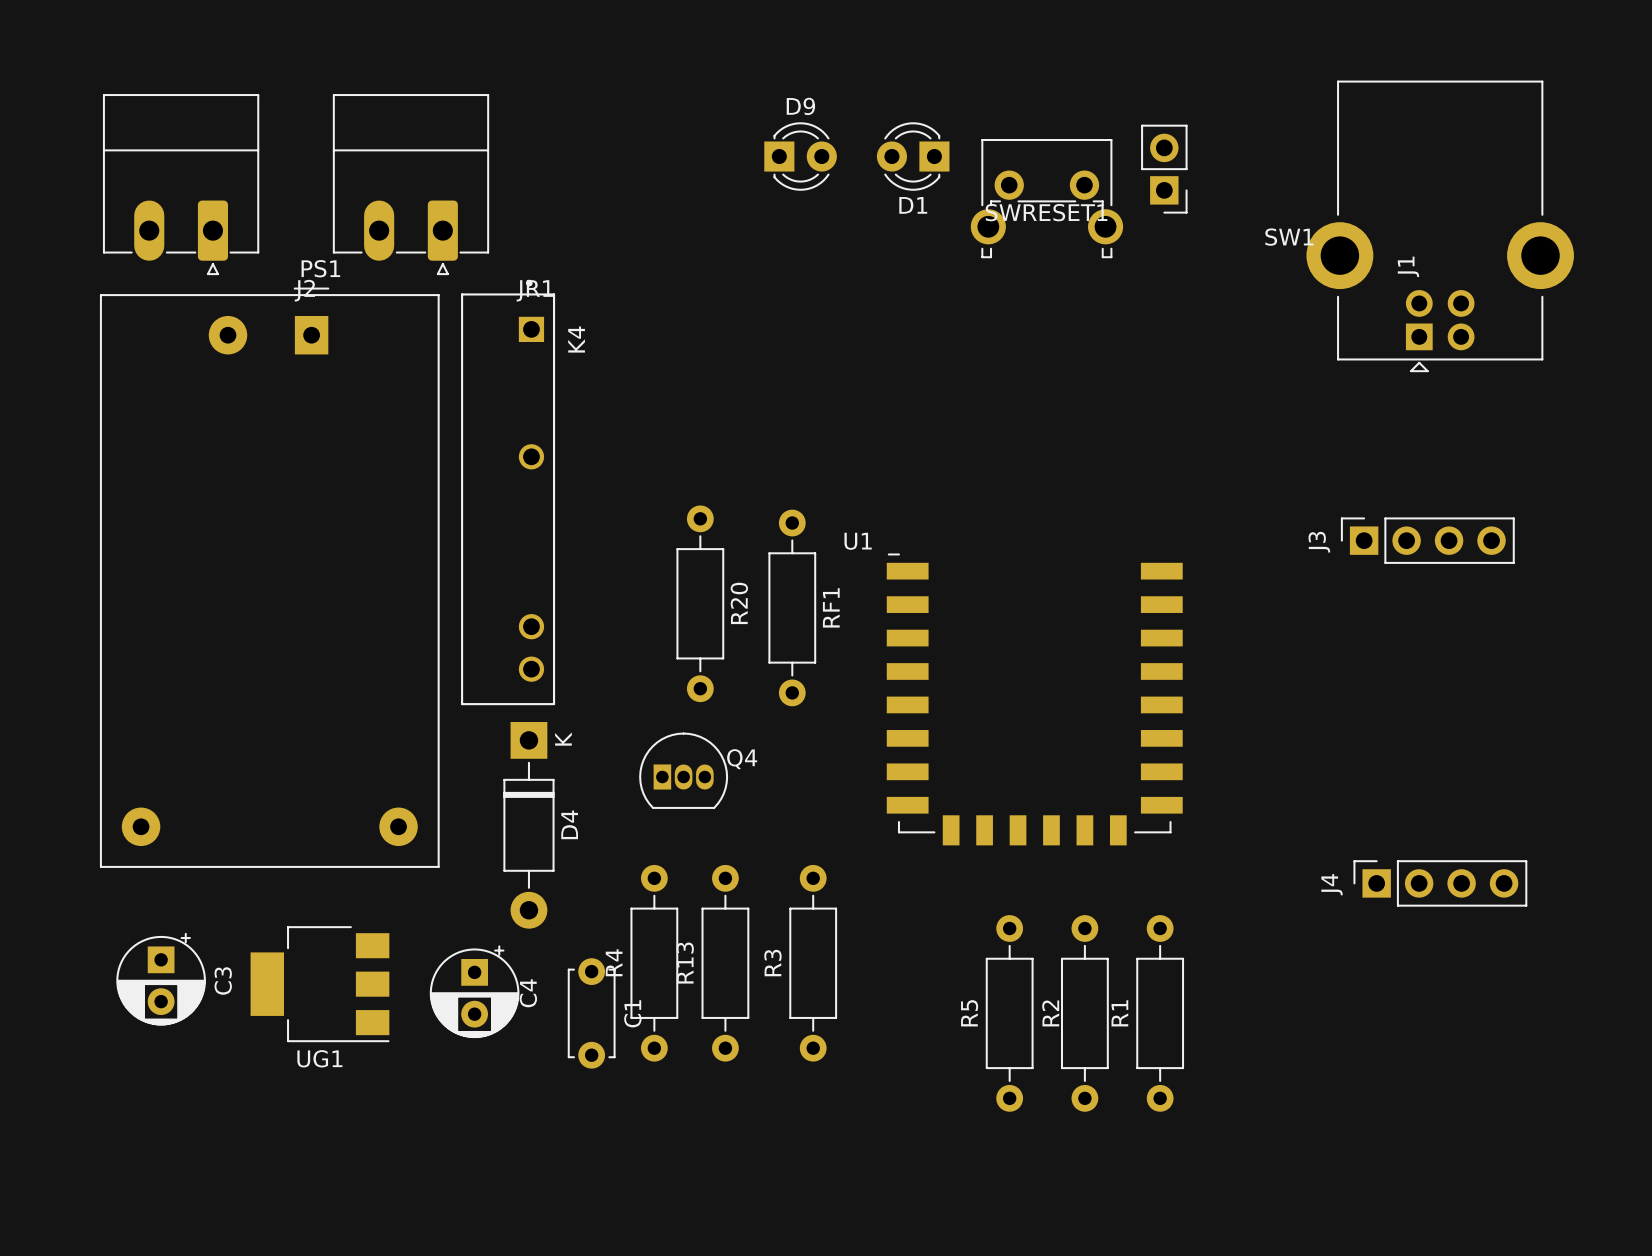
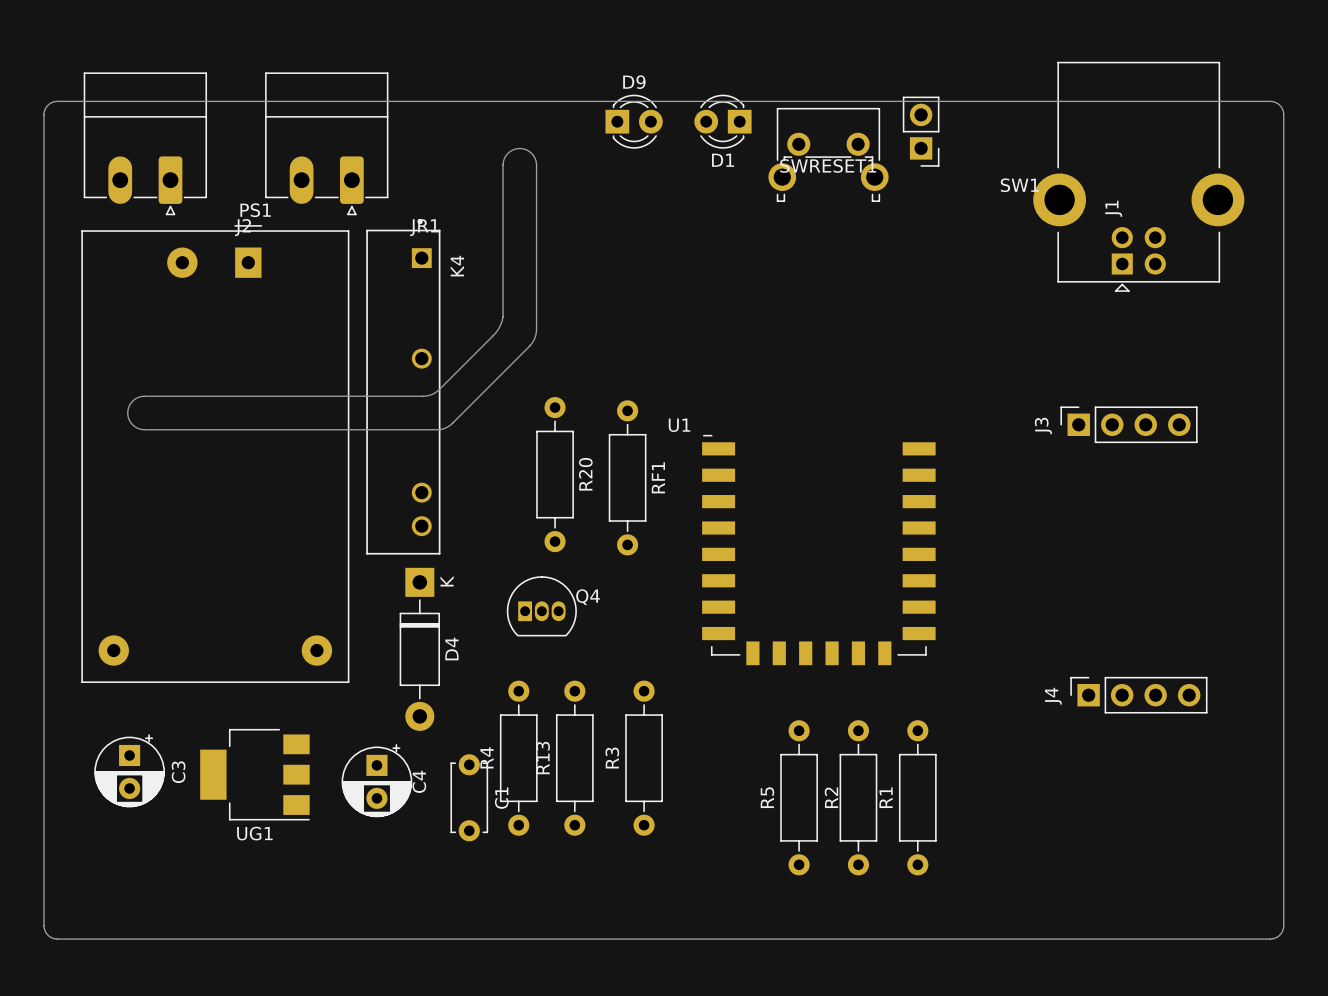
board edge: none -> (57, 101) (1270, 101) (1278, 104) (1283, 114) (1283, 925) (1280, 933) (1270, 939) (57, 939) (49, 936) (43, 925) (43, 114) (47, 105) (57, 101)
board edge: none -> (144, 396) (132, 401) (127, 412) (132, 424) (144, 429)
board edge: none -> (144, 396) (422, 396) (435, 392) (492, 335) (501, 323) (503, 316) (503, 162) (506, 154) (515, 149) (526, 149) (534, 156) (536, 165) (535, 335) (529, 345) (448, 426) (439, 429) (144, 429)

